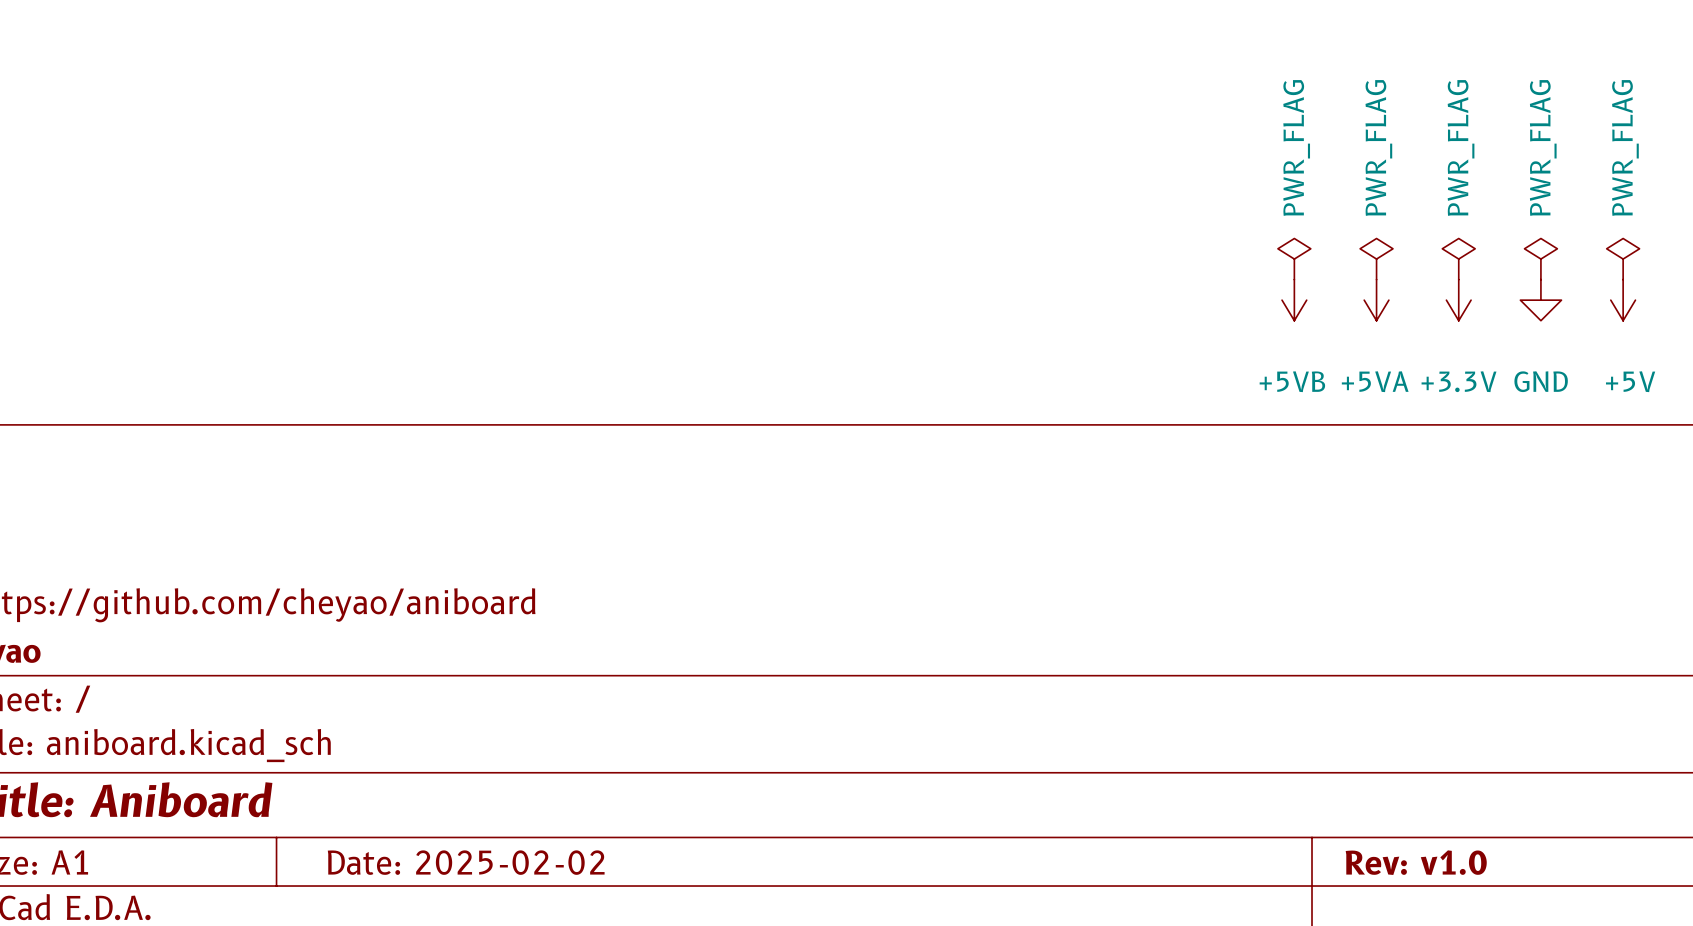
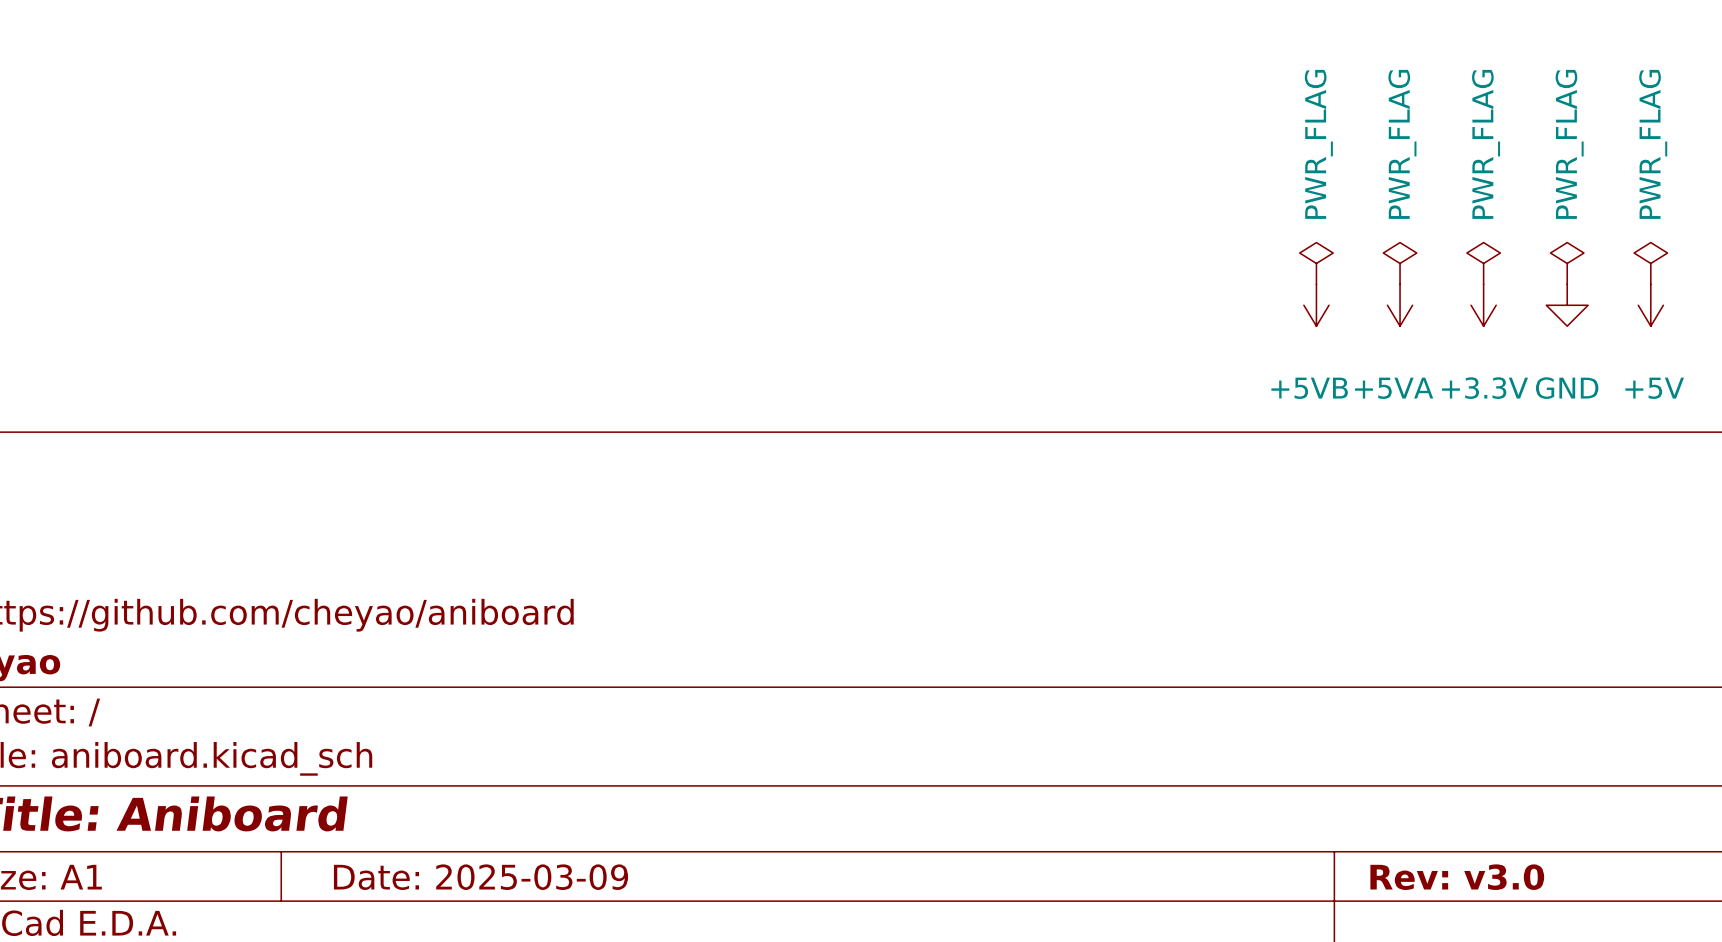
title block: Date: 2025-02-02 (466, 862) -> Date: 2025-03-09 (481, 877)
title block: Rev: v1.0 (1416, 862) -> Rev: v3.0 (1457, 877)

